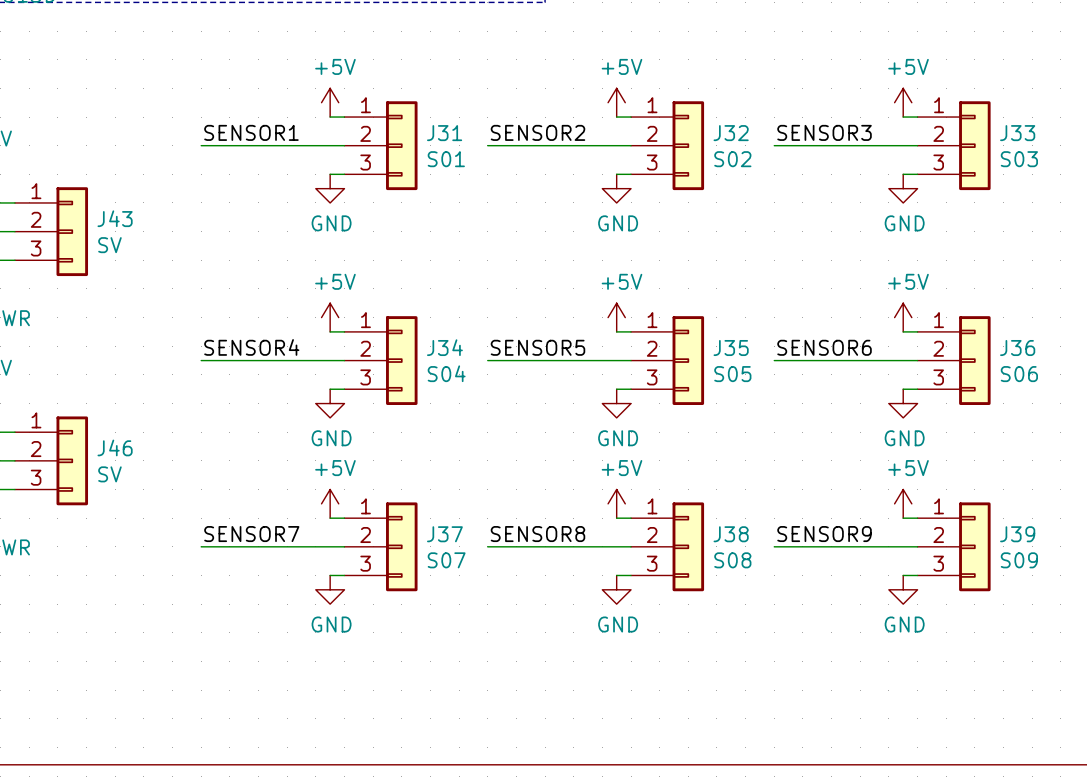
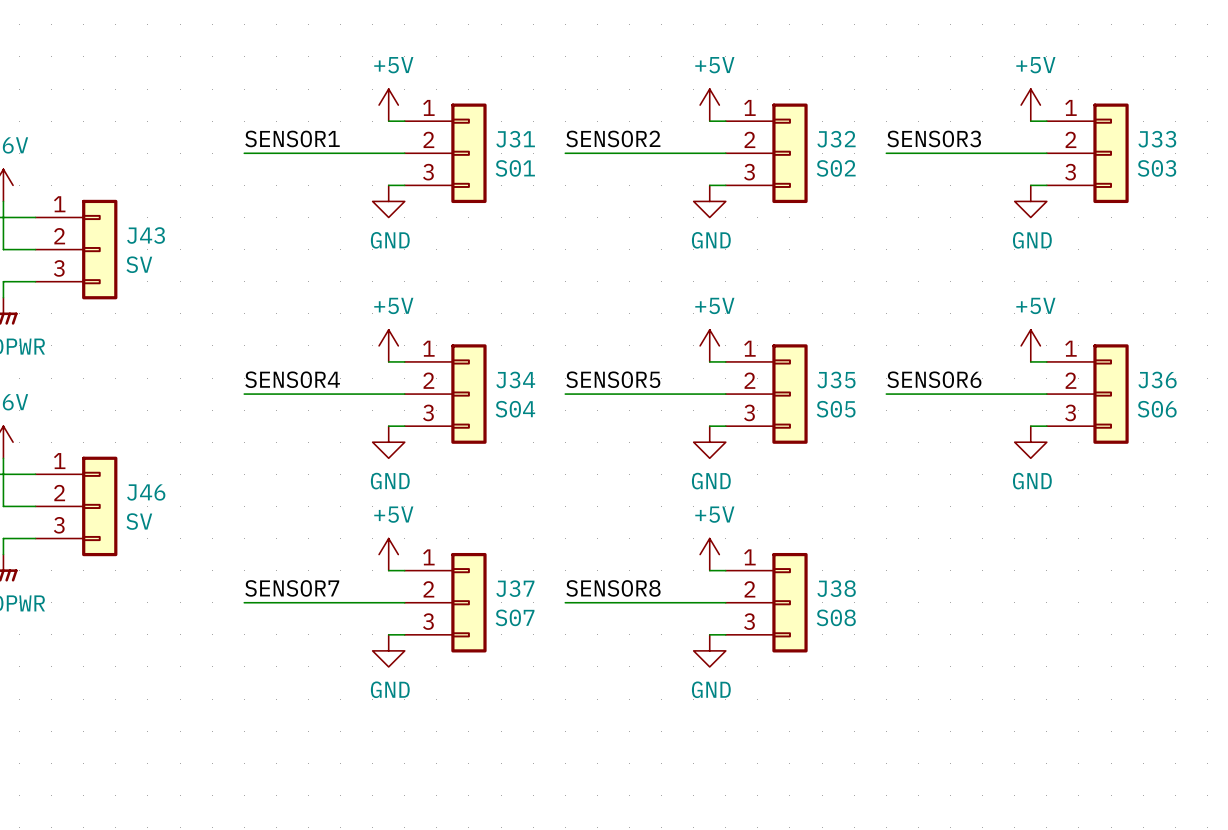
power symbol: +5V (903, 503) -> none
wire: (903, 518) (917, 518) -> none
label: SENSOR9 (824, 534) -> none
wire: (774, 546) (917, 546) -> none
J39: S09 (954, 546) -> none
wire: (903, 575) (917, 575) -> none
power symbol: GND (903, 589) -> none

